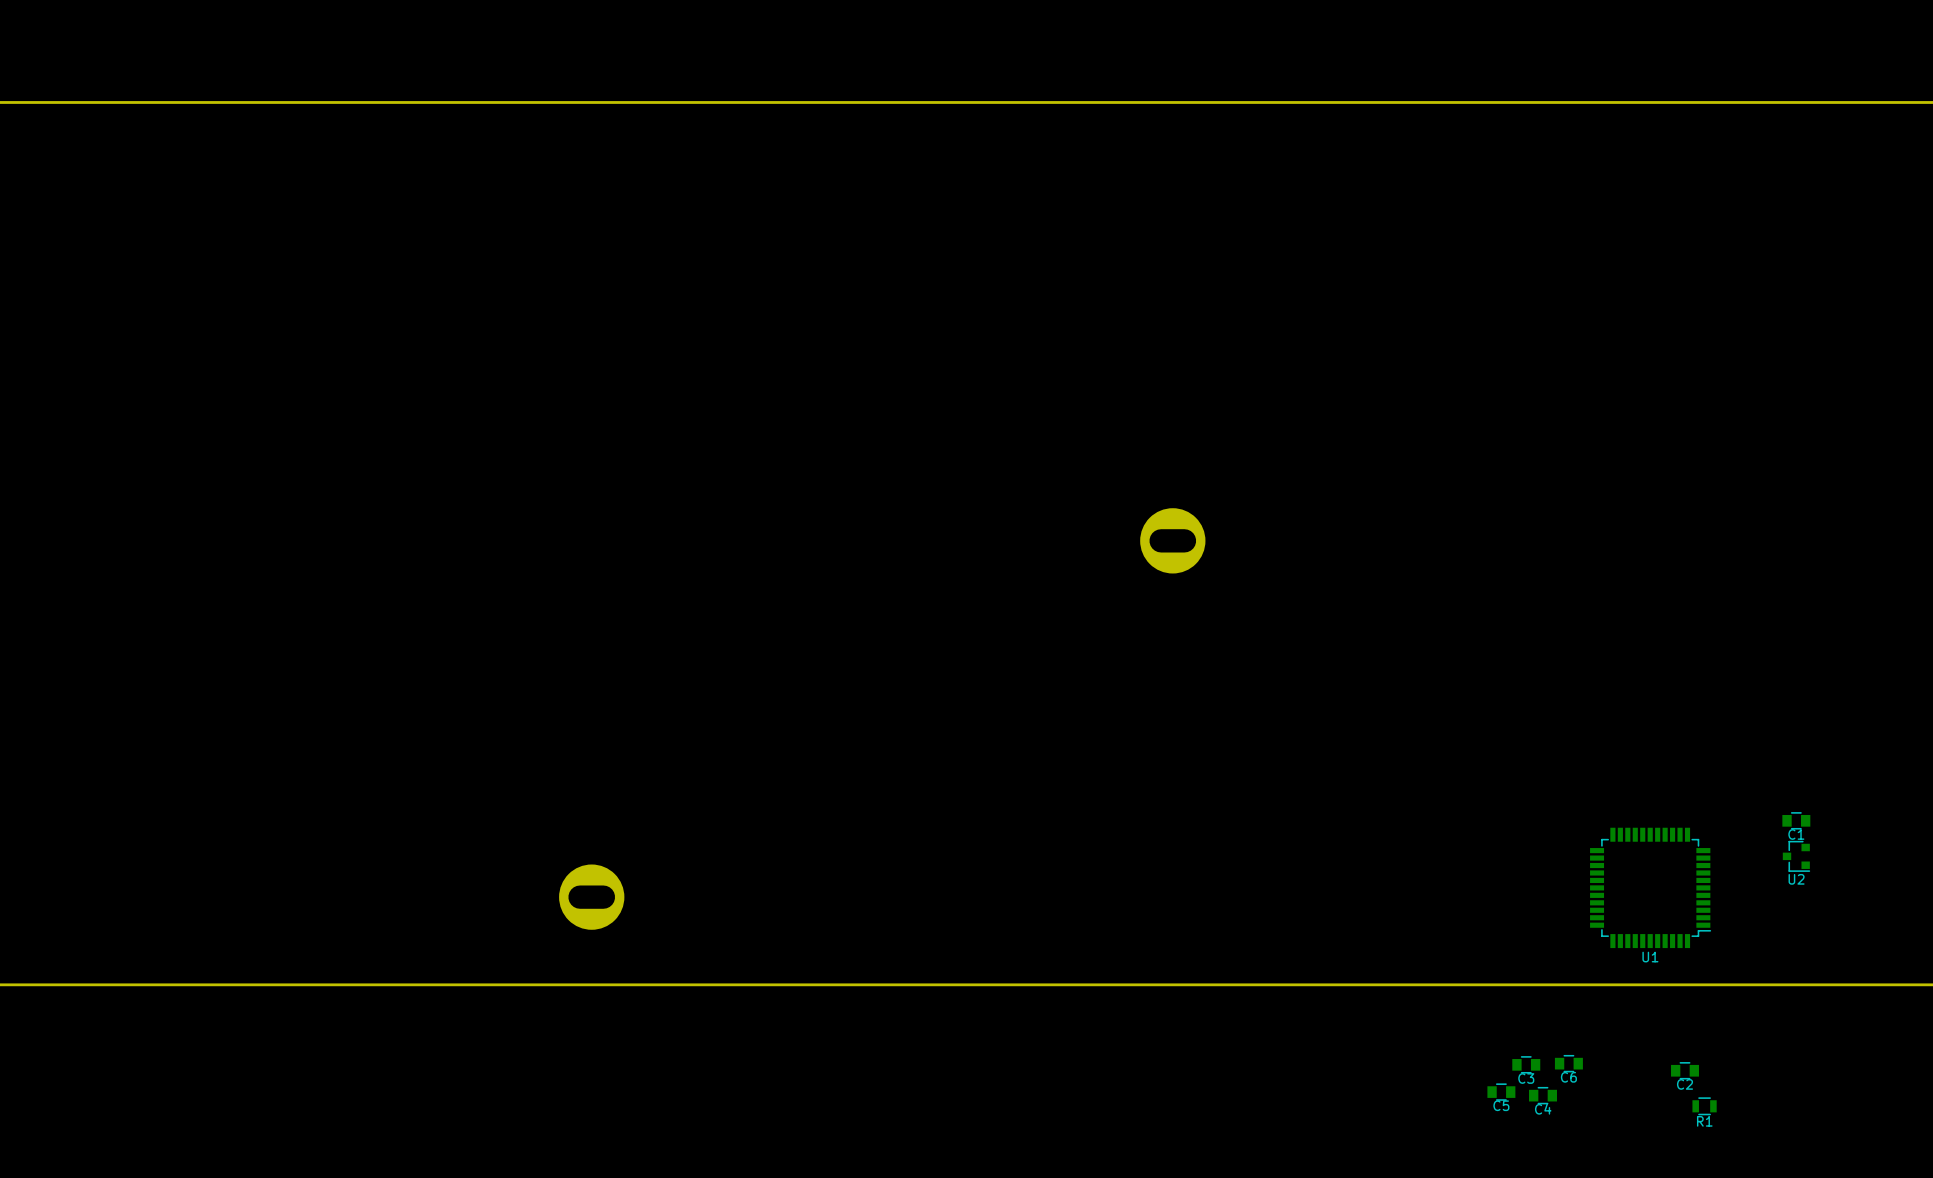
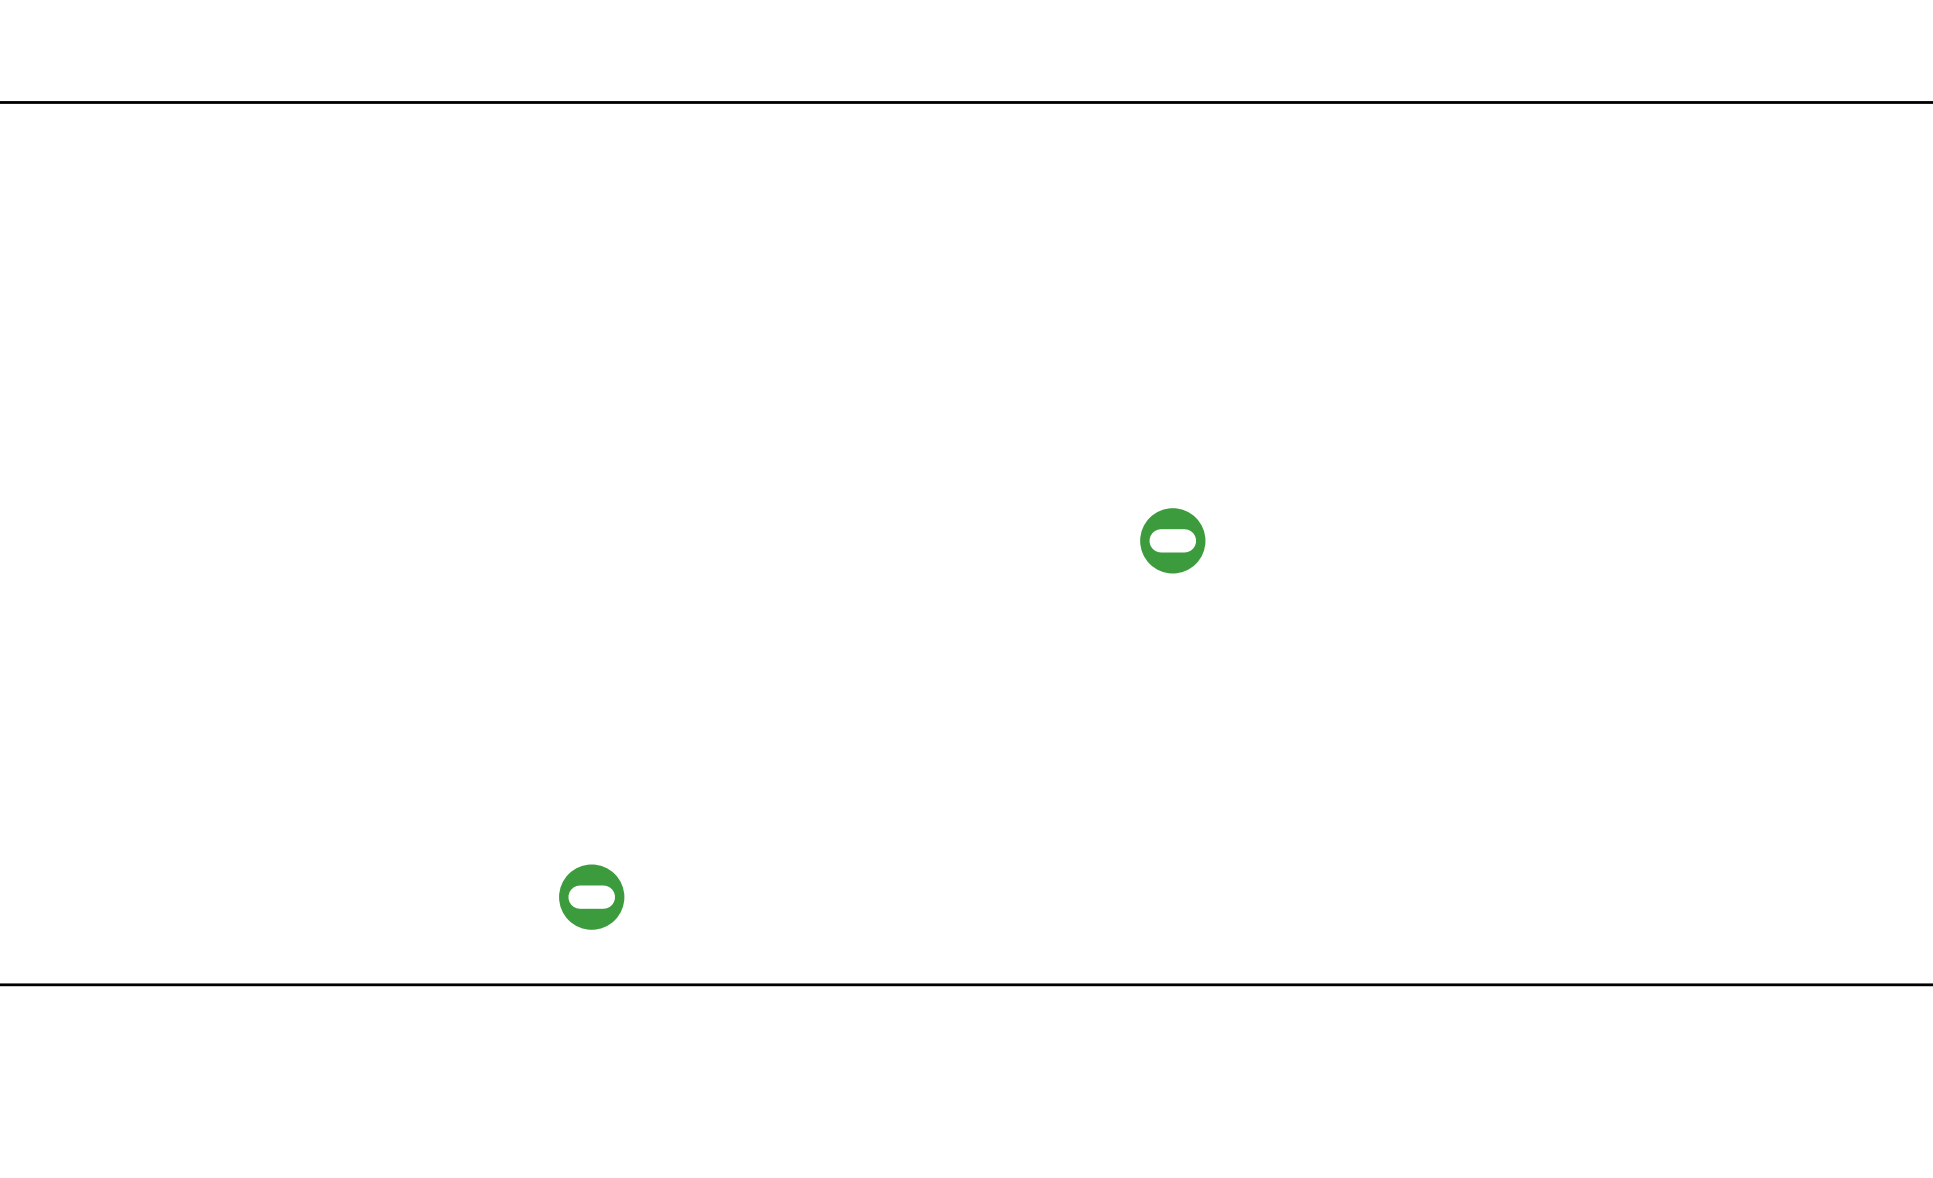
C1: (1796, 820) -> none
U2: (1796, 856) -> none
U1: (1650, 887) -> none
C6: (1568, 1063) -> none
C3: (1526, 1064) -> none
C2: (1685, 1070) -> none
C5: (1501, 1092) -> none
C4: (1543, 1095) -> none
R1: (1704, 1106) -> none

